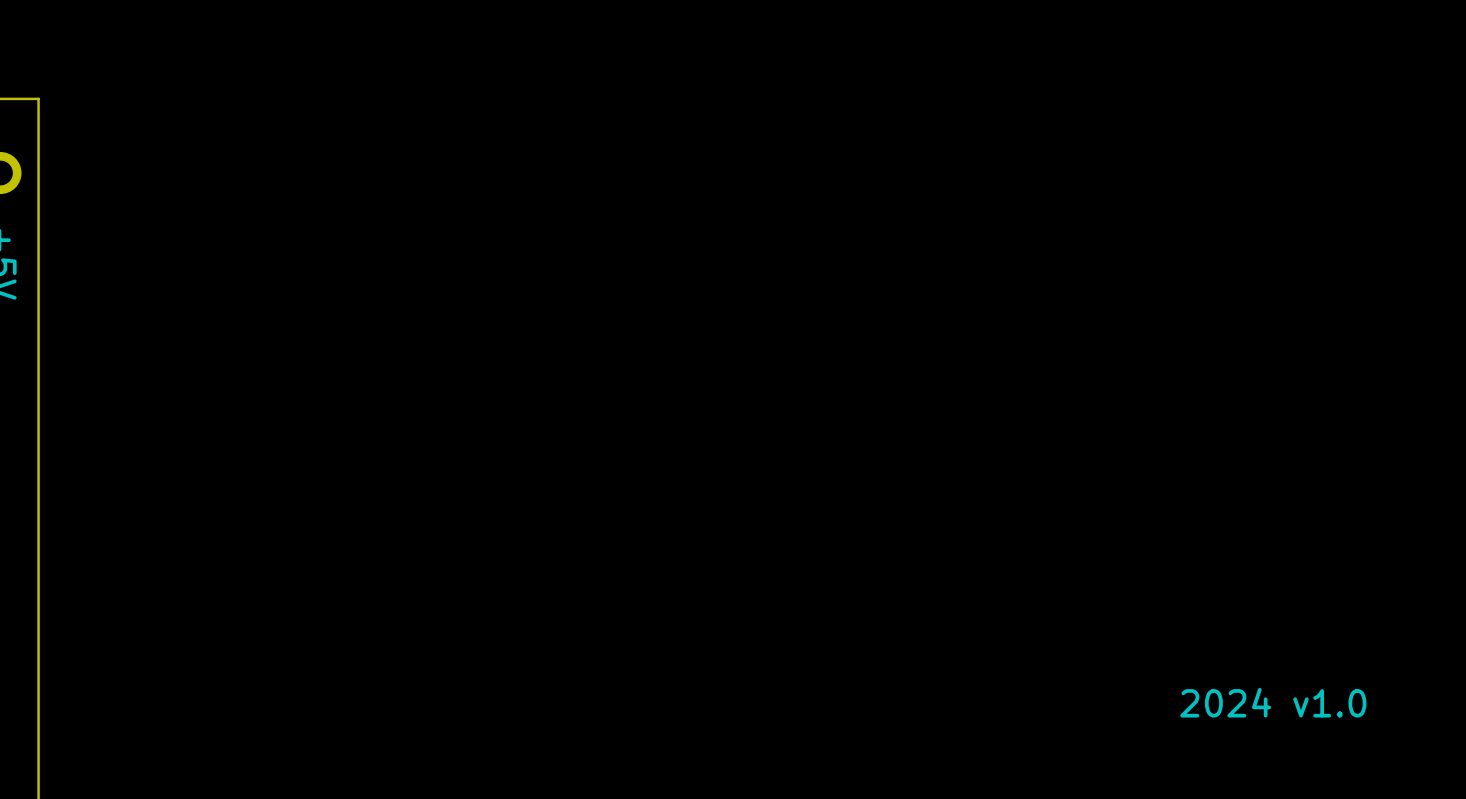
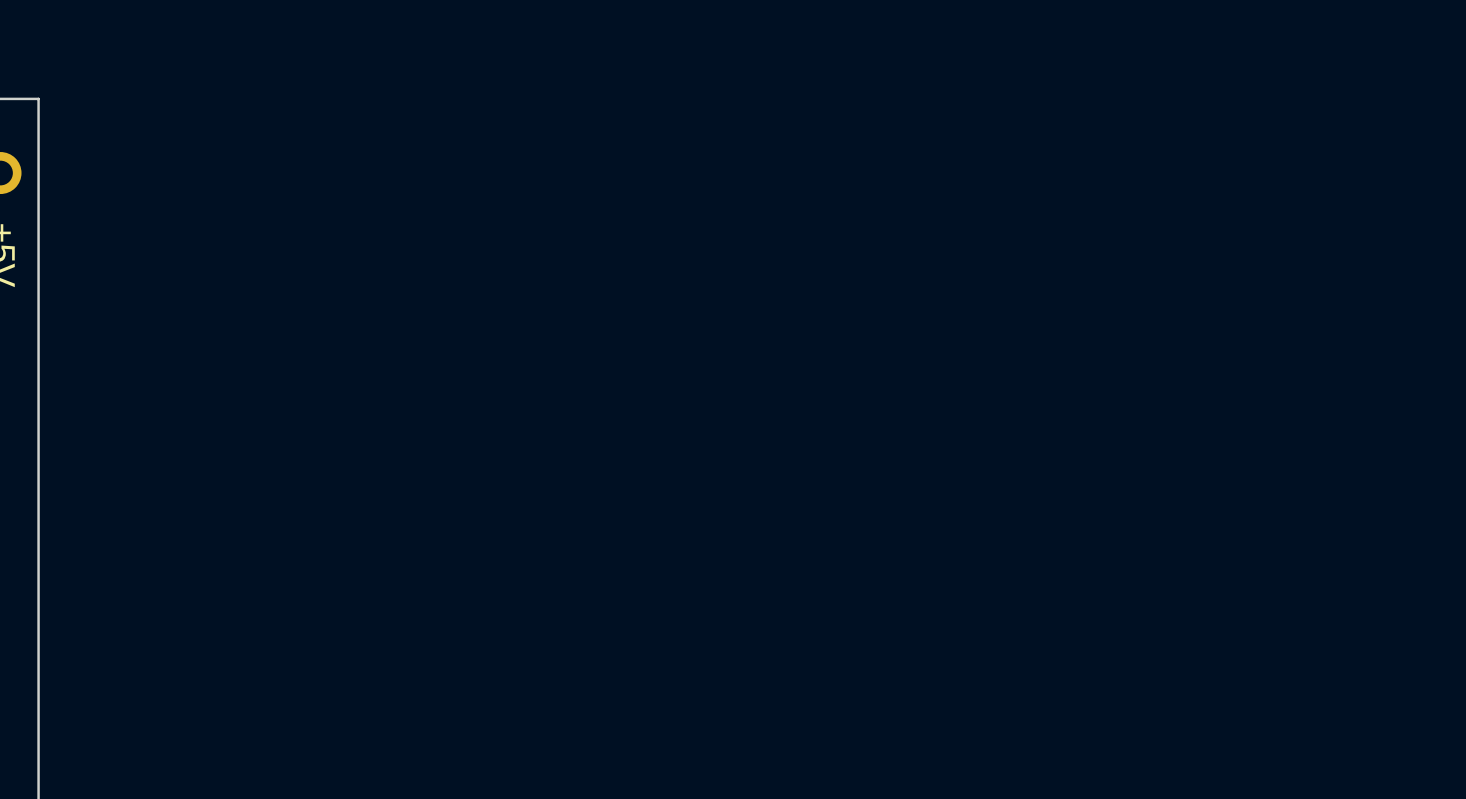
text: 2024 v1.0 (1273, 702) -> none

